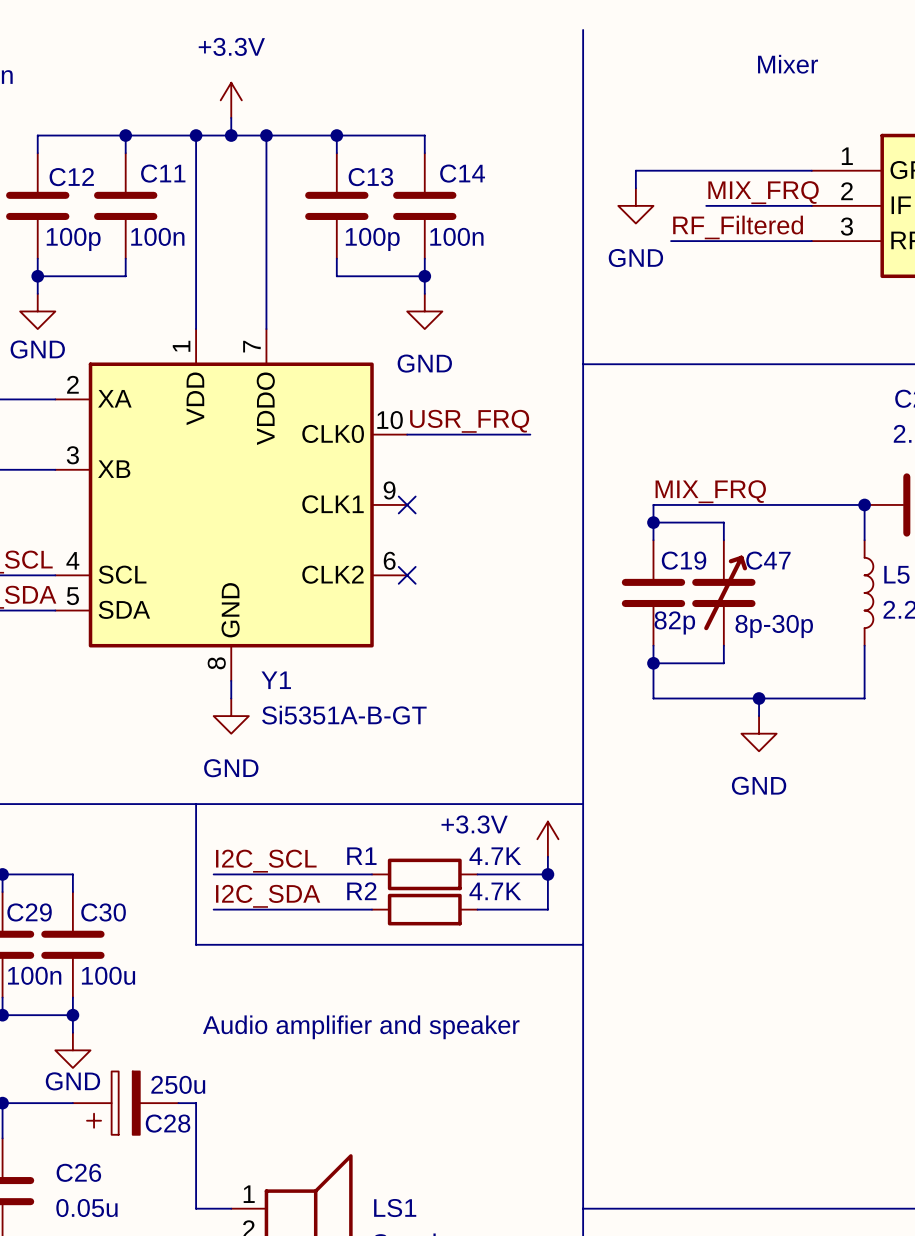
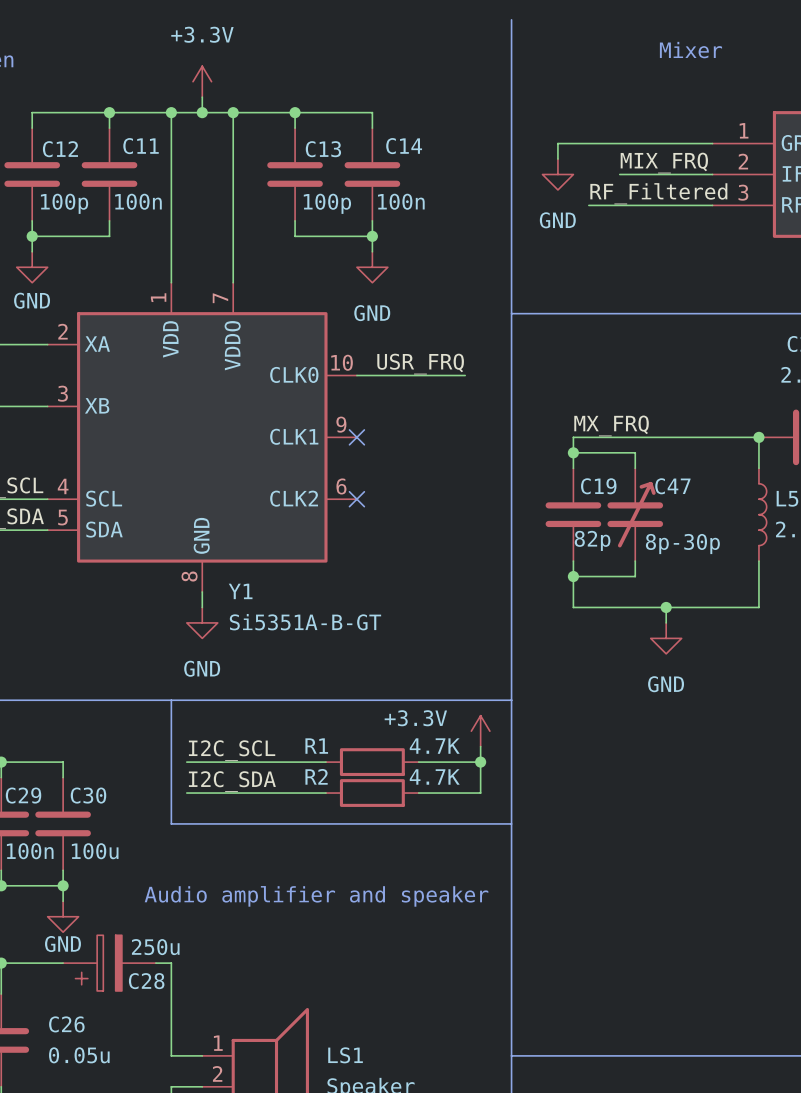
label: MIX_FRQ (710, 491) -> MX_FRQ (611, 425)

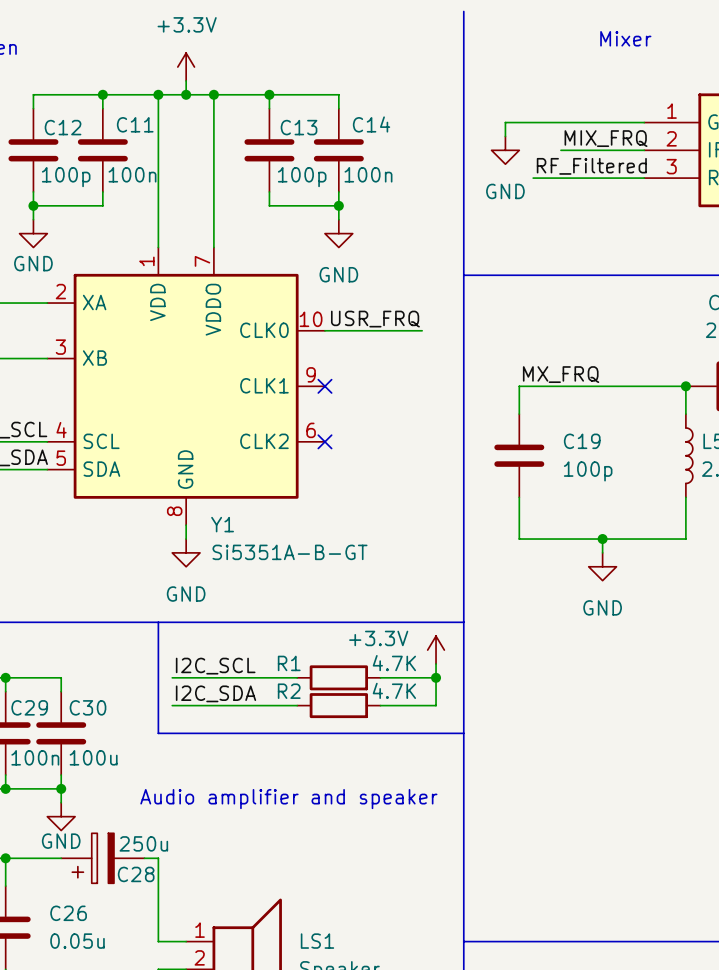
wire: (573, 452) (635, 452) (635, 468) -> none
junction: (573, 452) -> none
C19 name position: C19 (598, 486) -> C19 (582, 441)
C47: 8p-30p (635, 514) -> none
C19 value: 82p (592, 540) -> 100p (588, 471)
wire: (635, 561) (635, 576) (573, 576) -> none
junction: (573, 576) -> none

